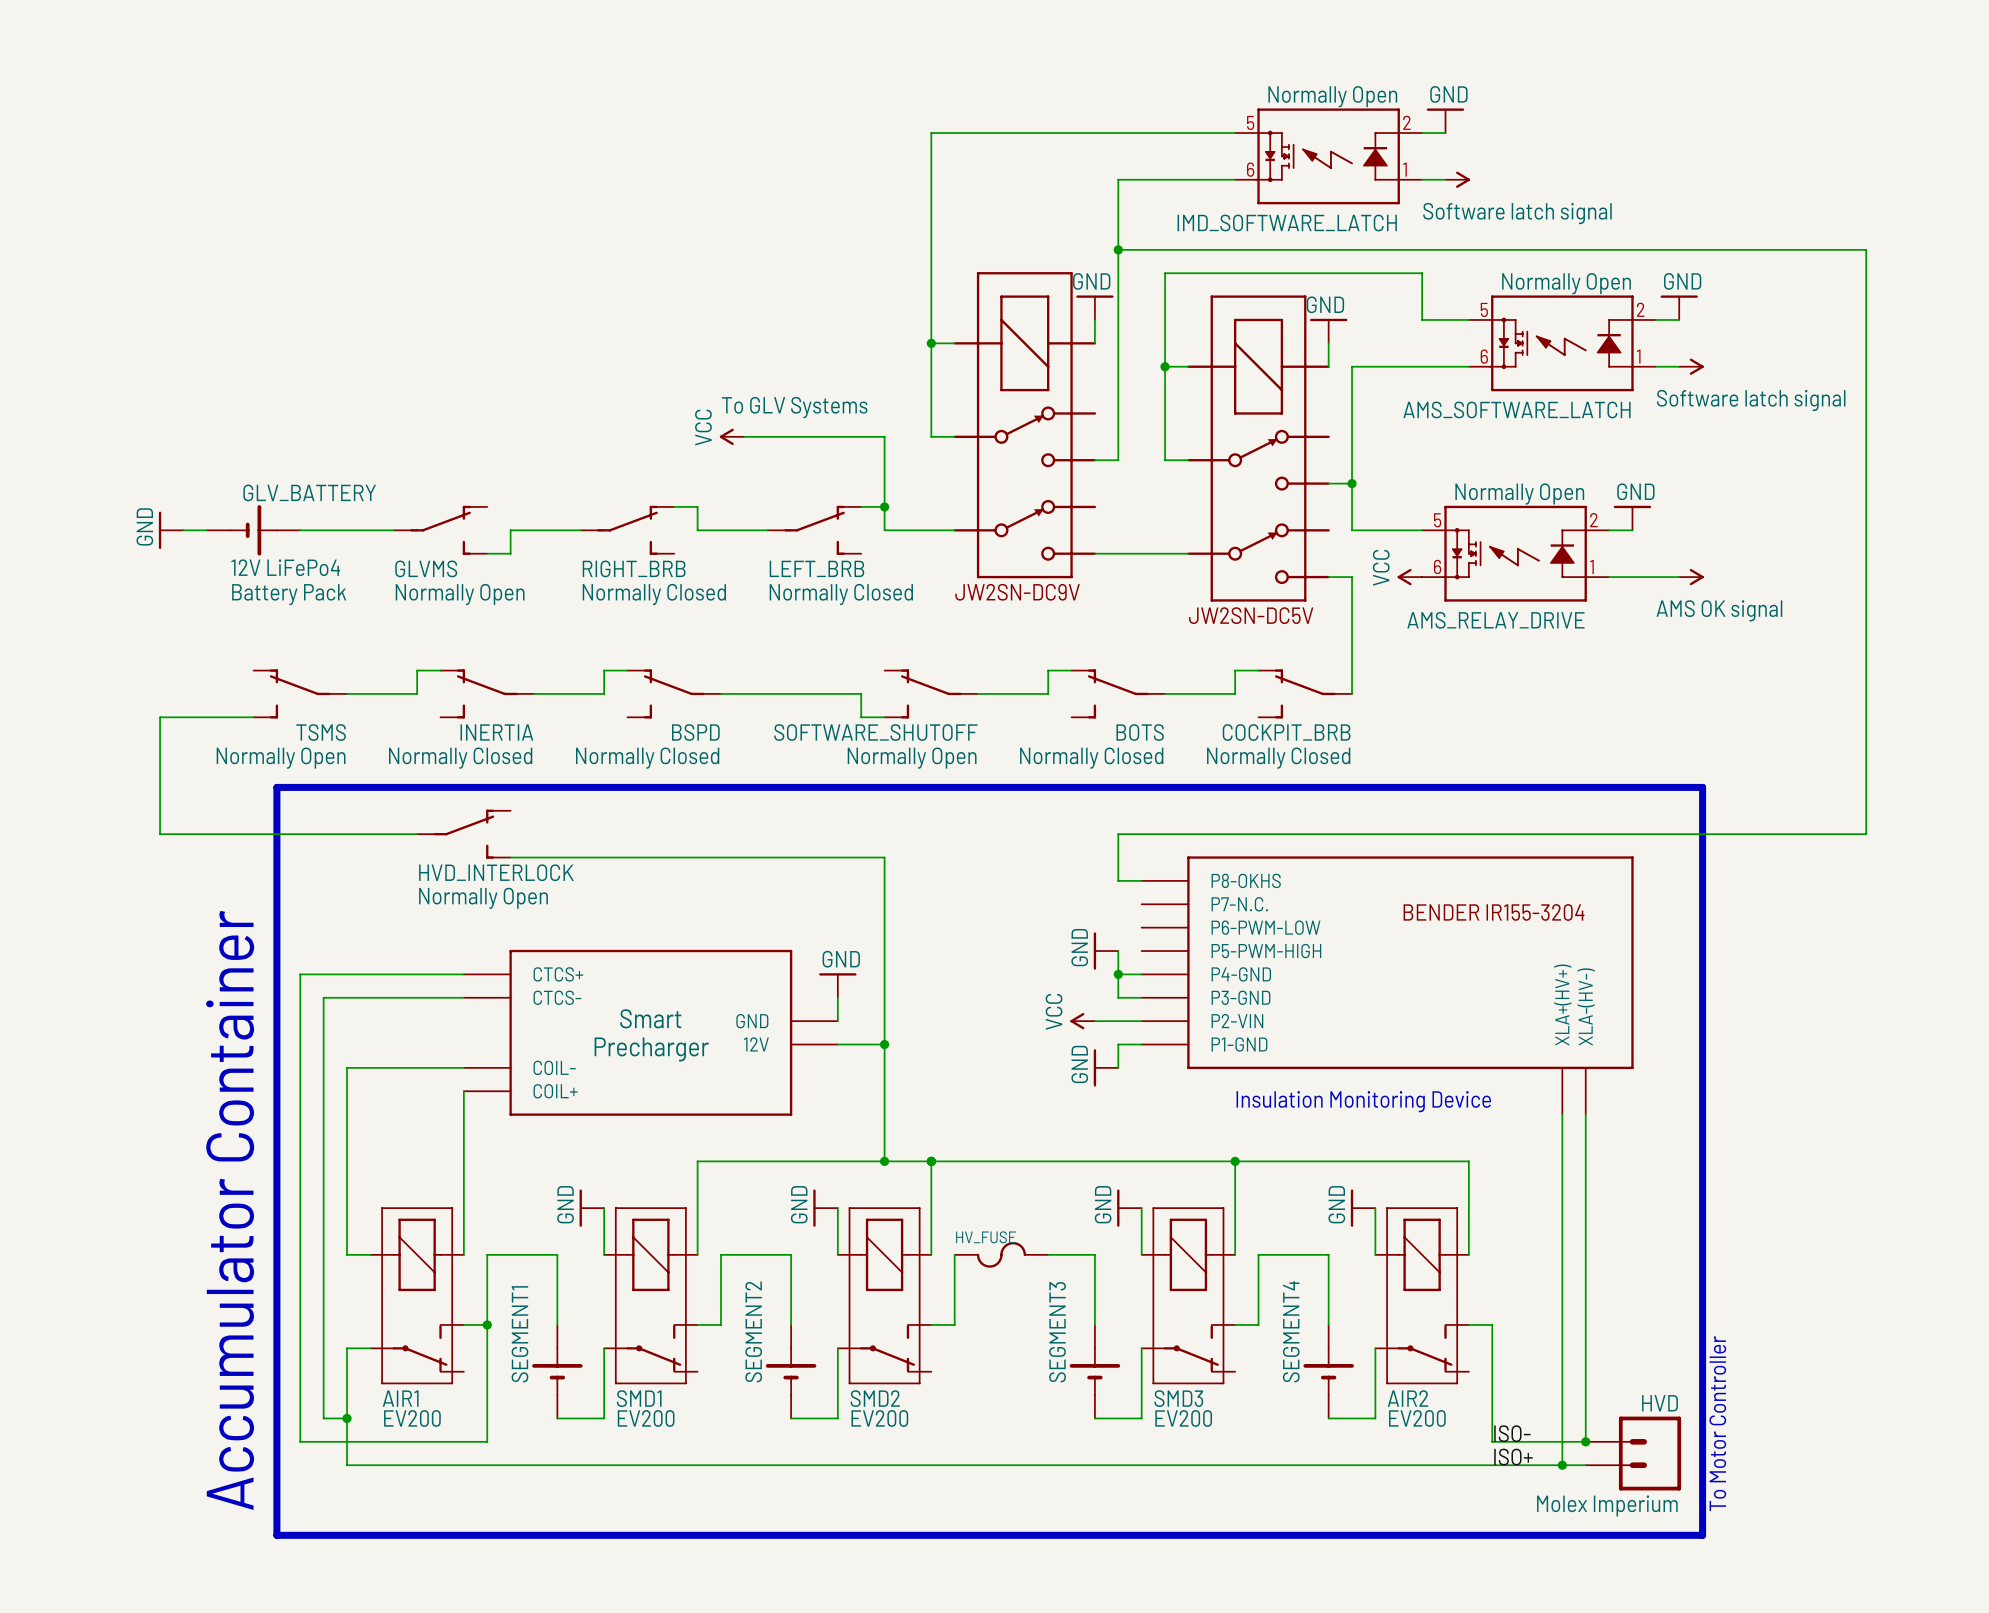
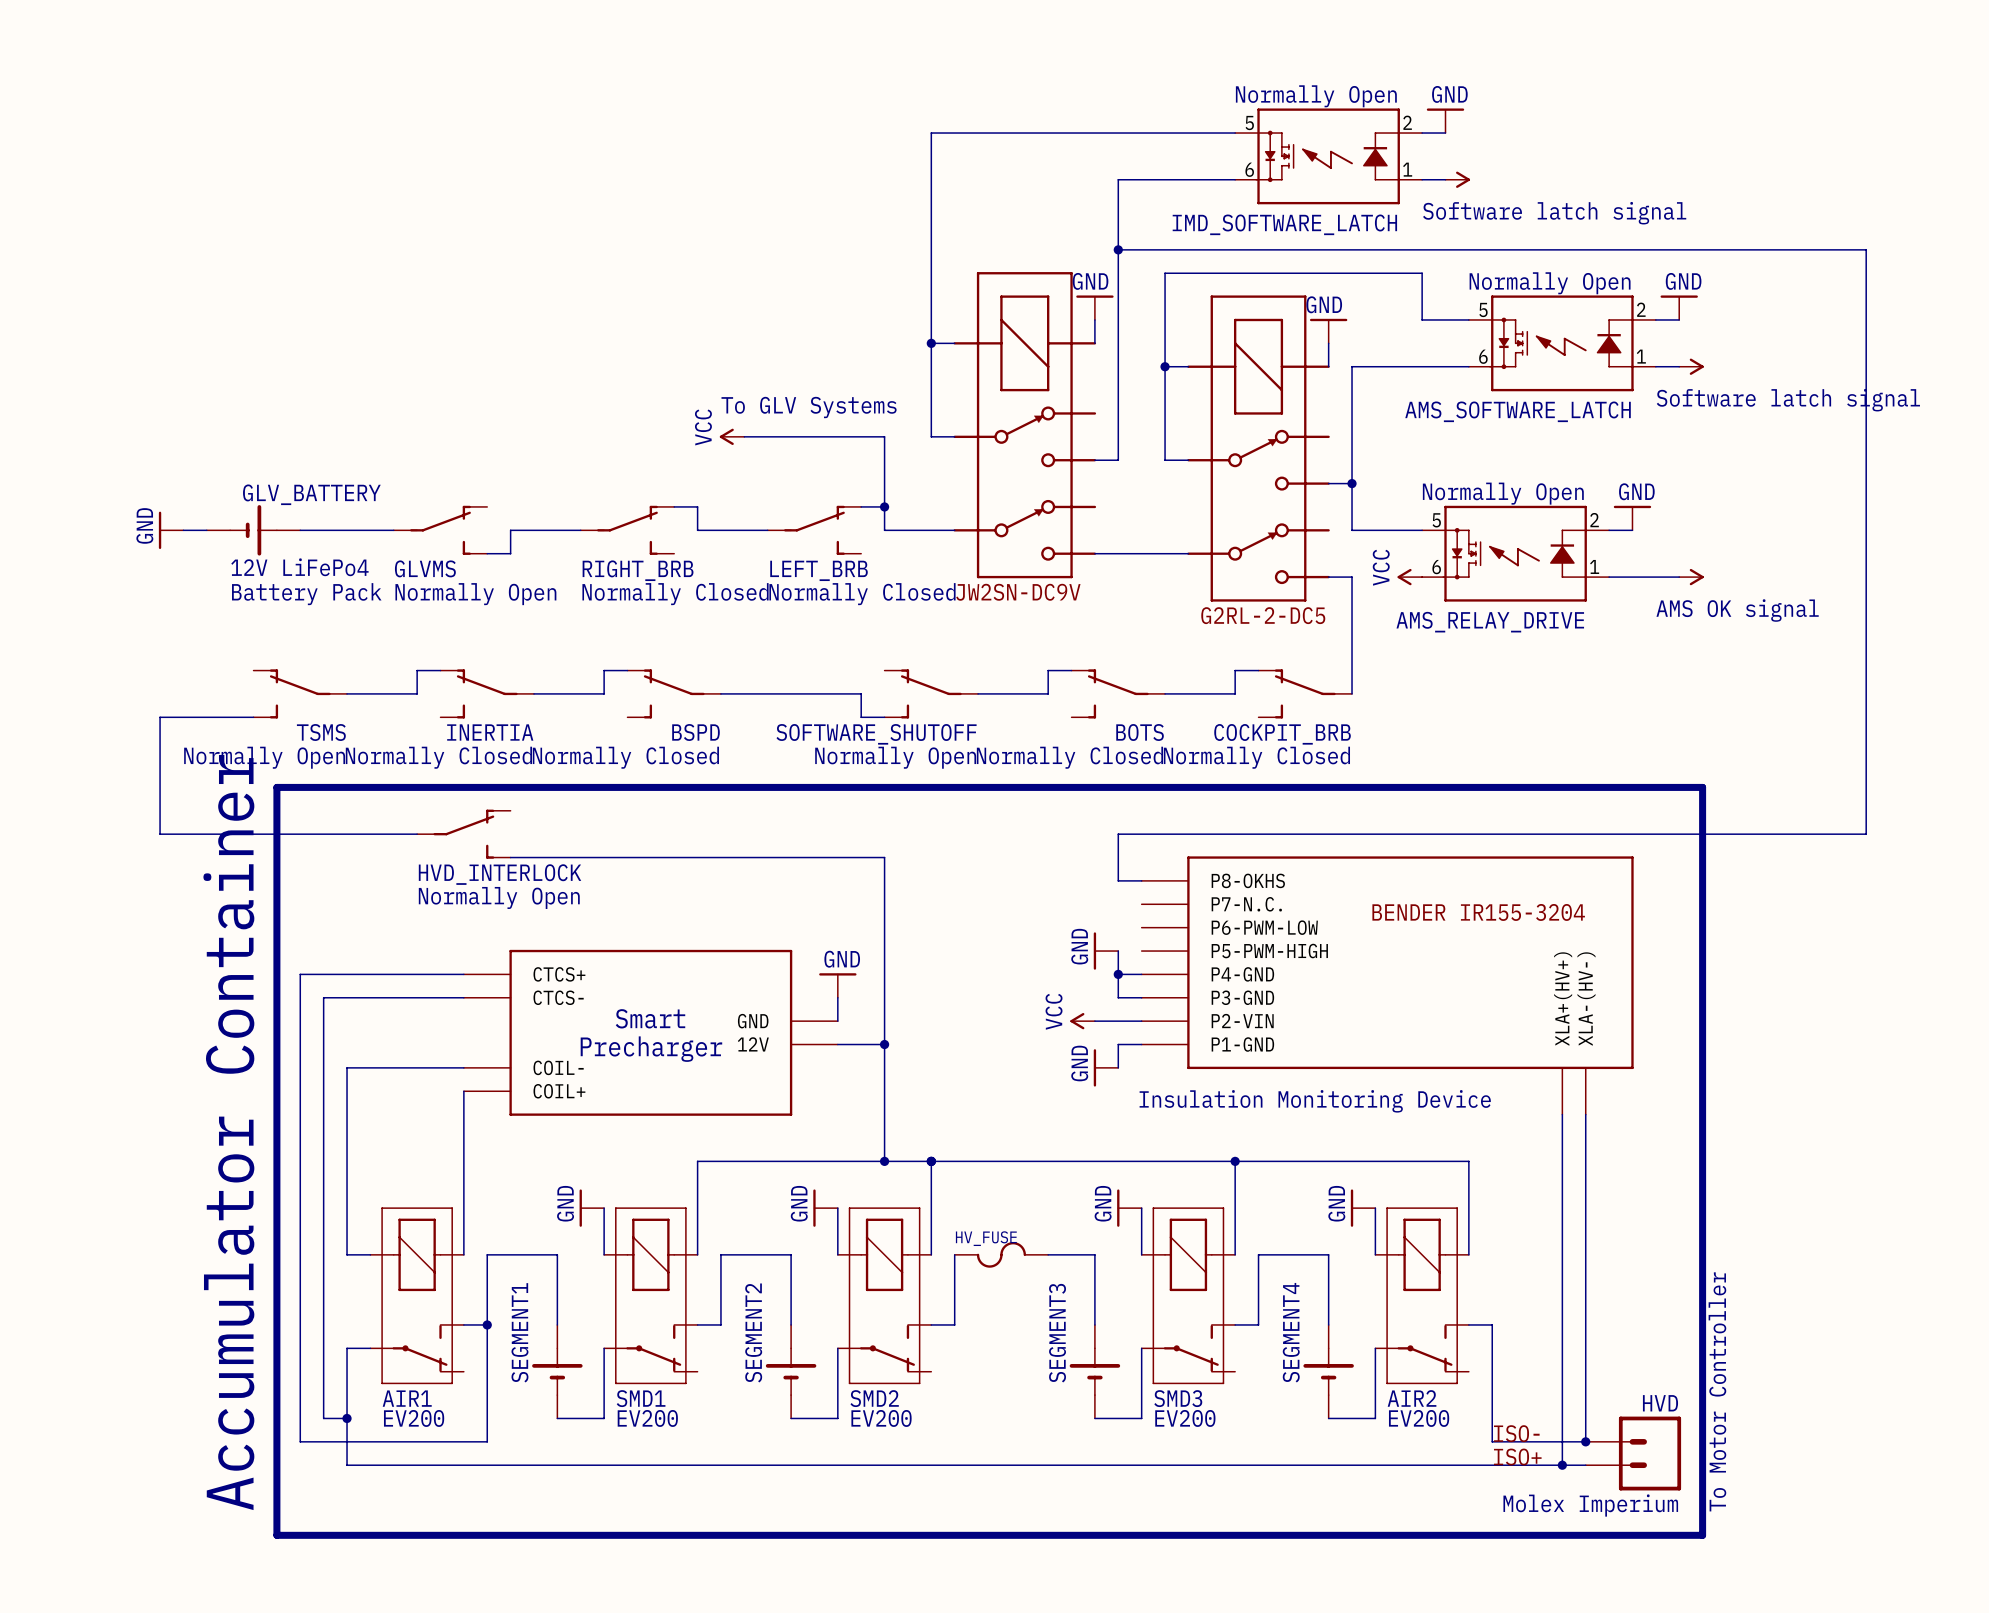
part text: JW2SN-DC5V (1251, 615) -> none
part value: none -> G2RL-2-DC5 (1263, 615)

